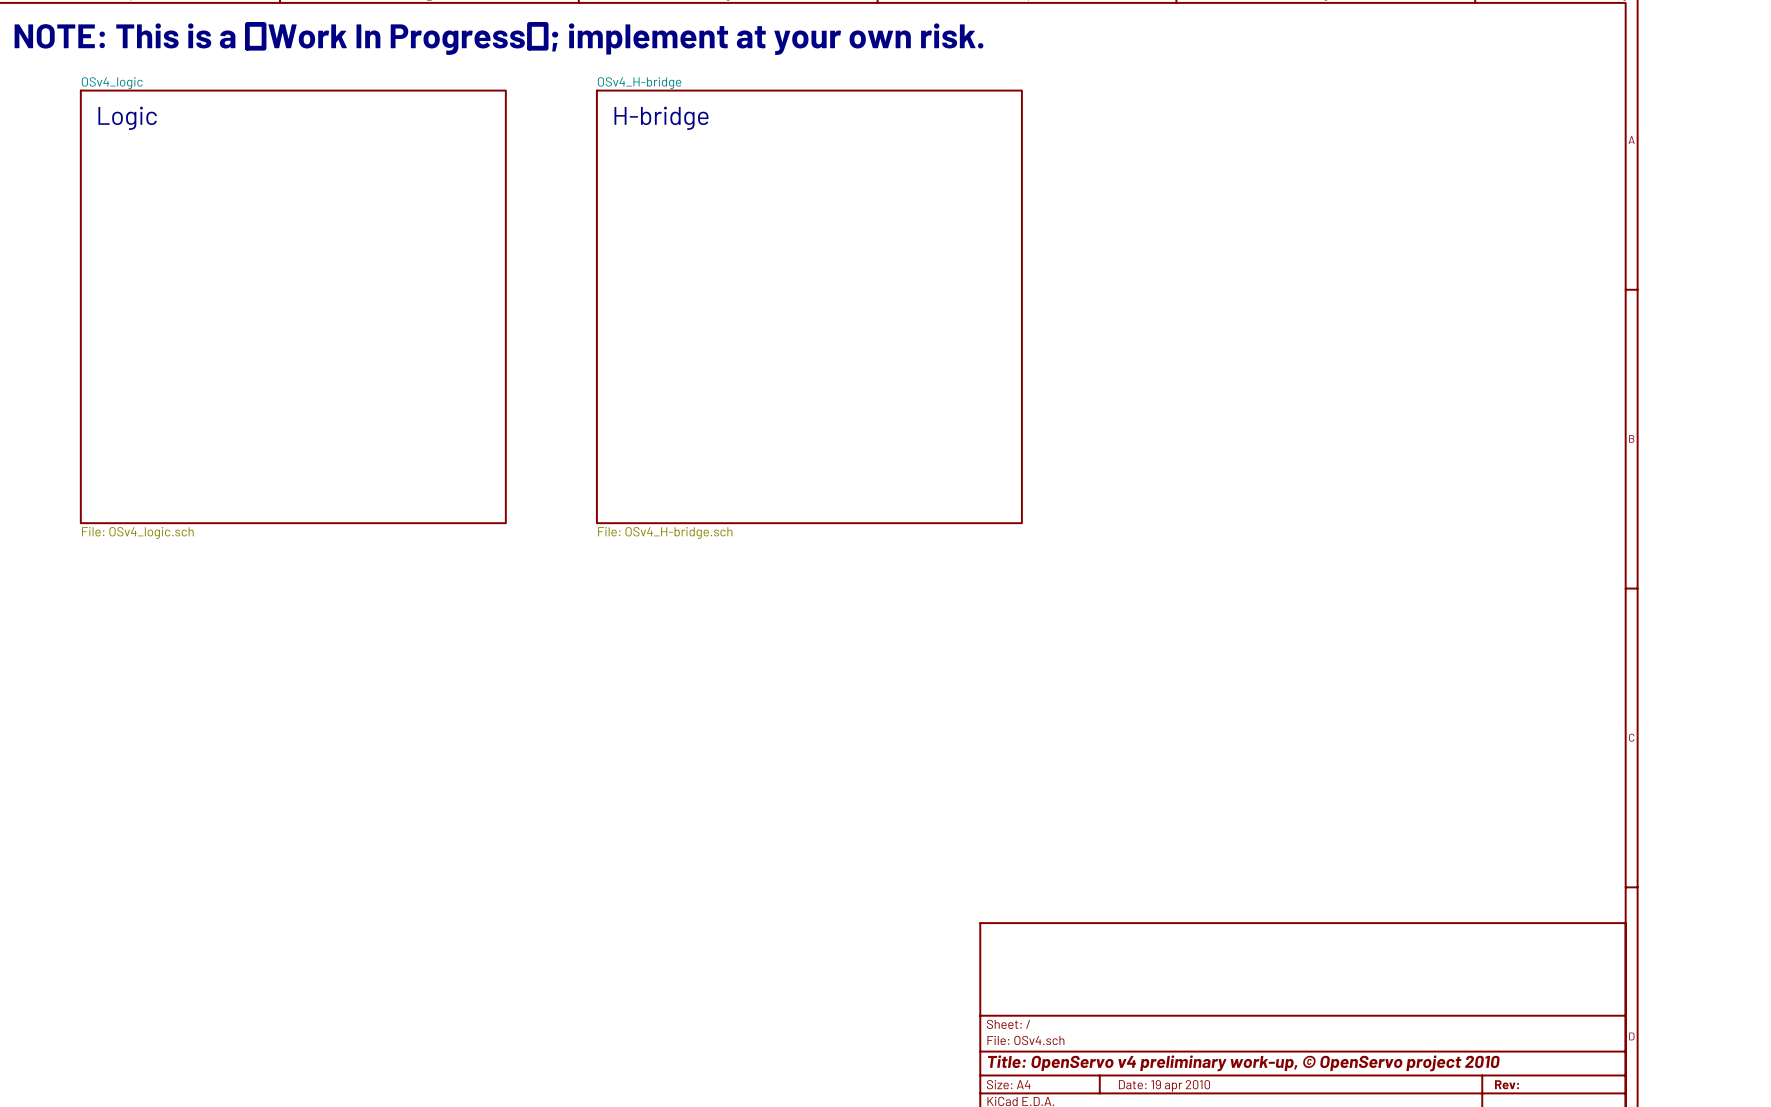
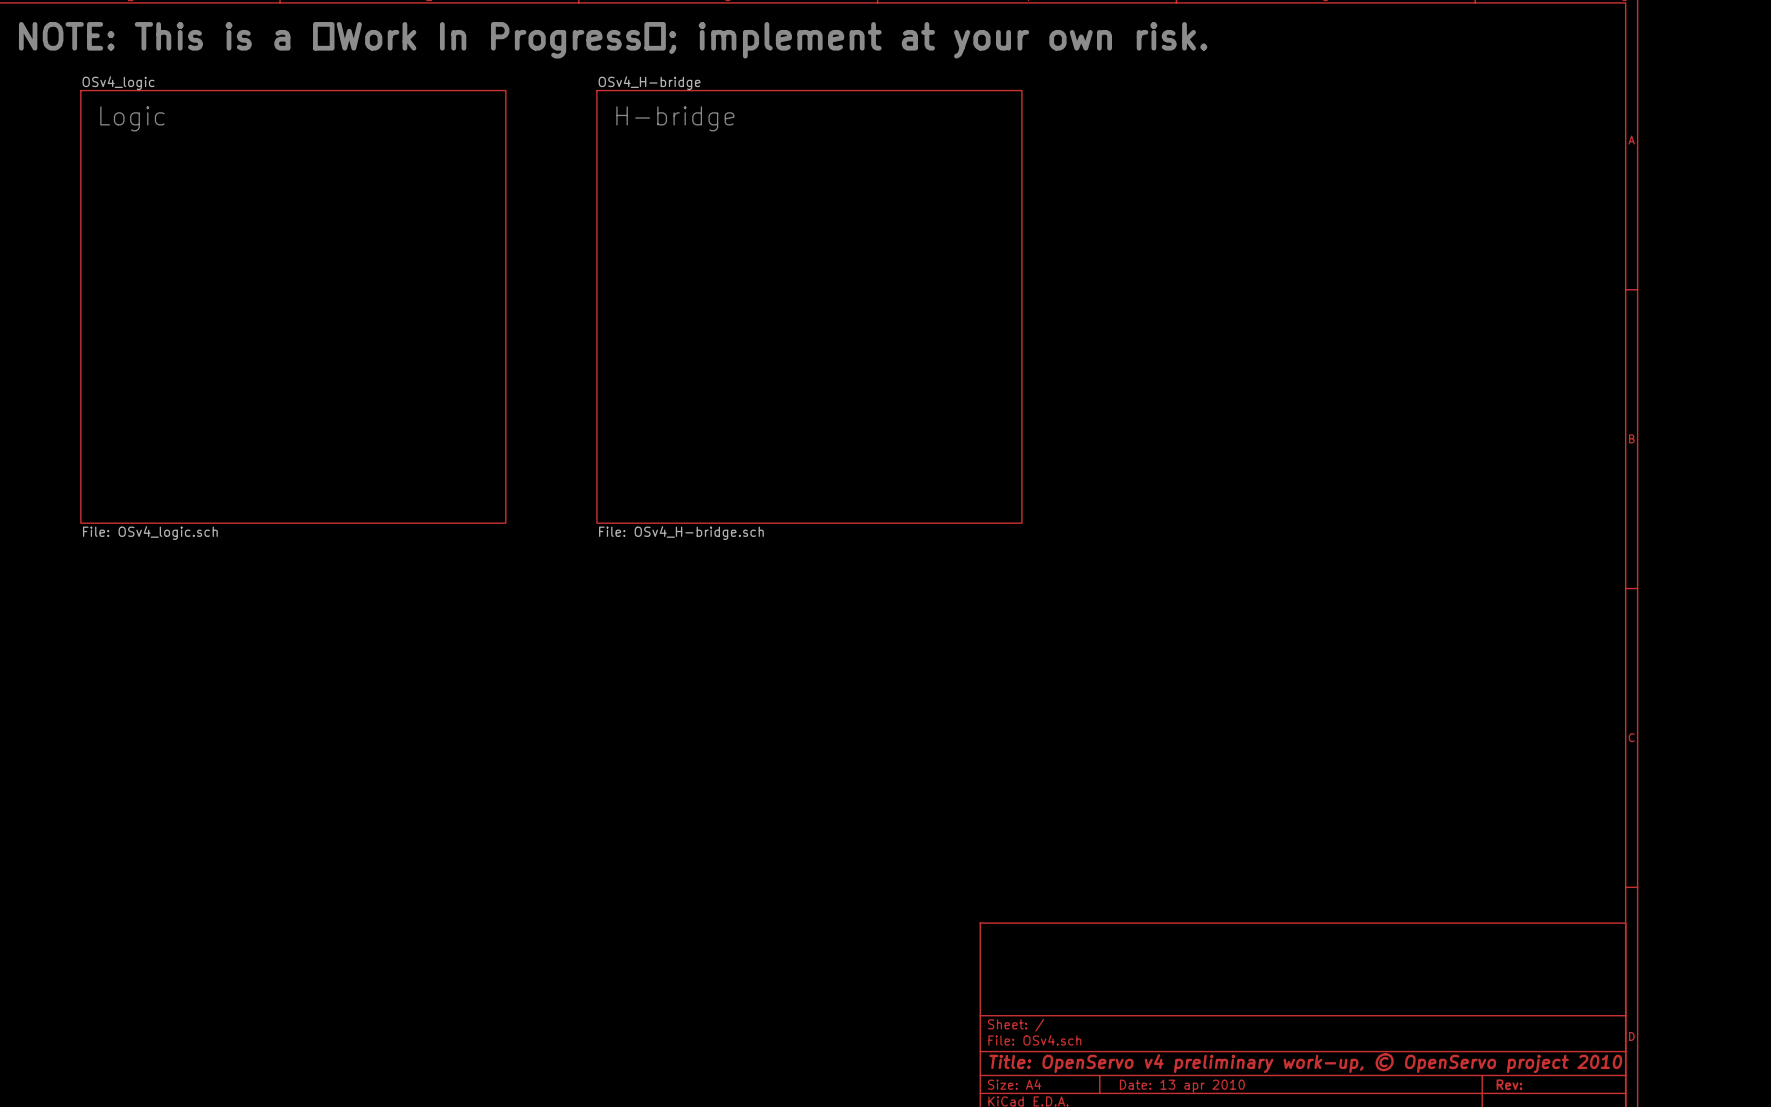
title block: Date: 19 apr 2010 (1164, 1085) -> Date: 13 apr 2010 (1182, 1086)

